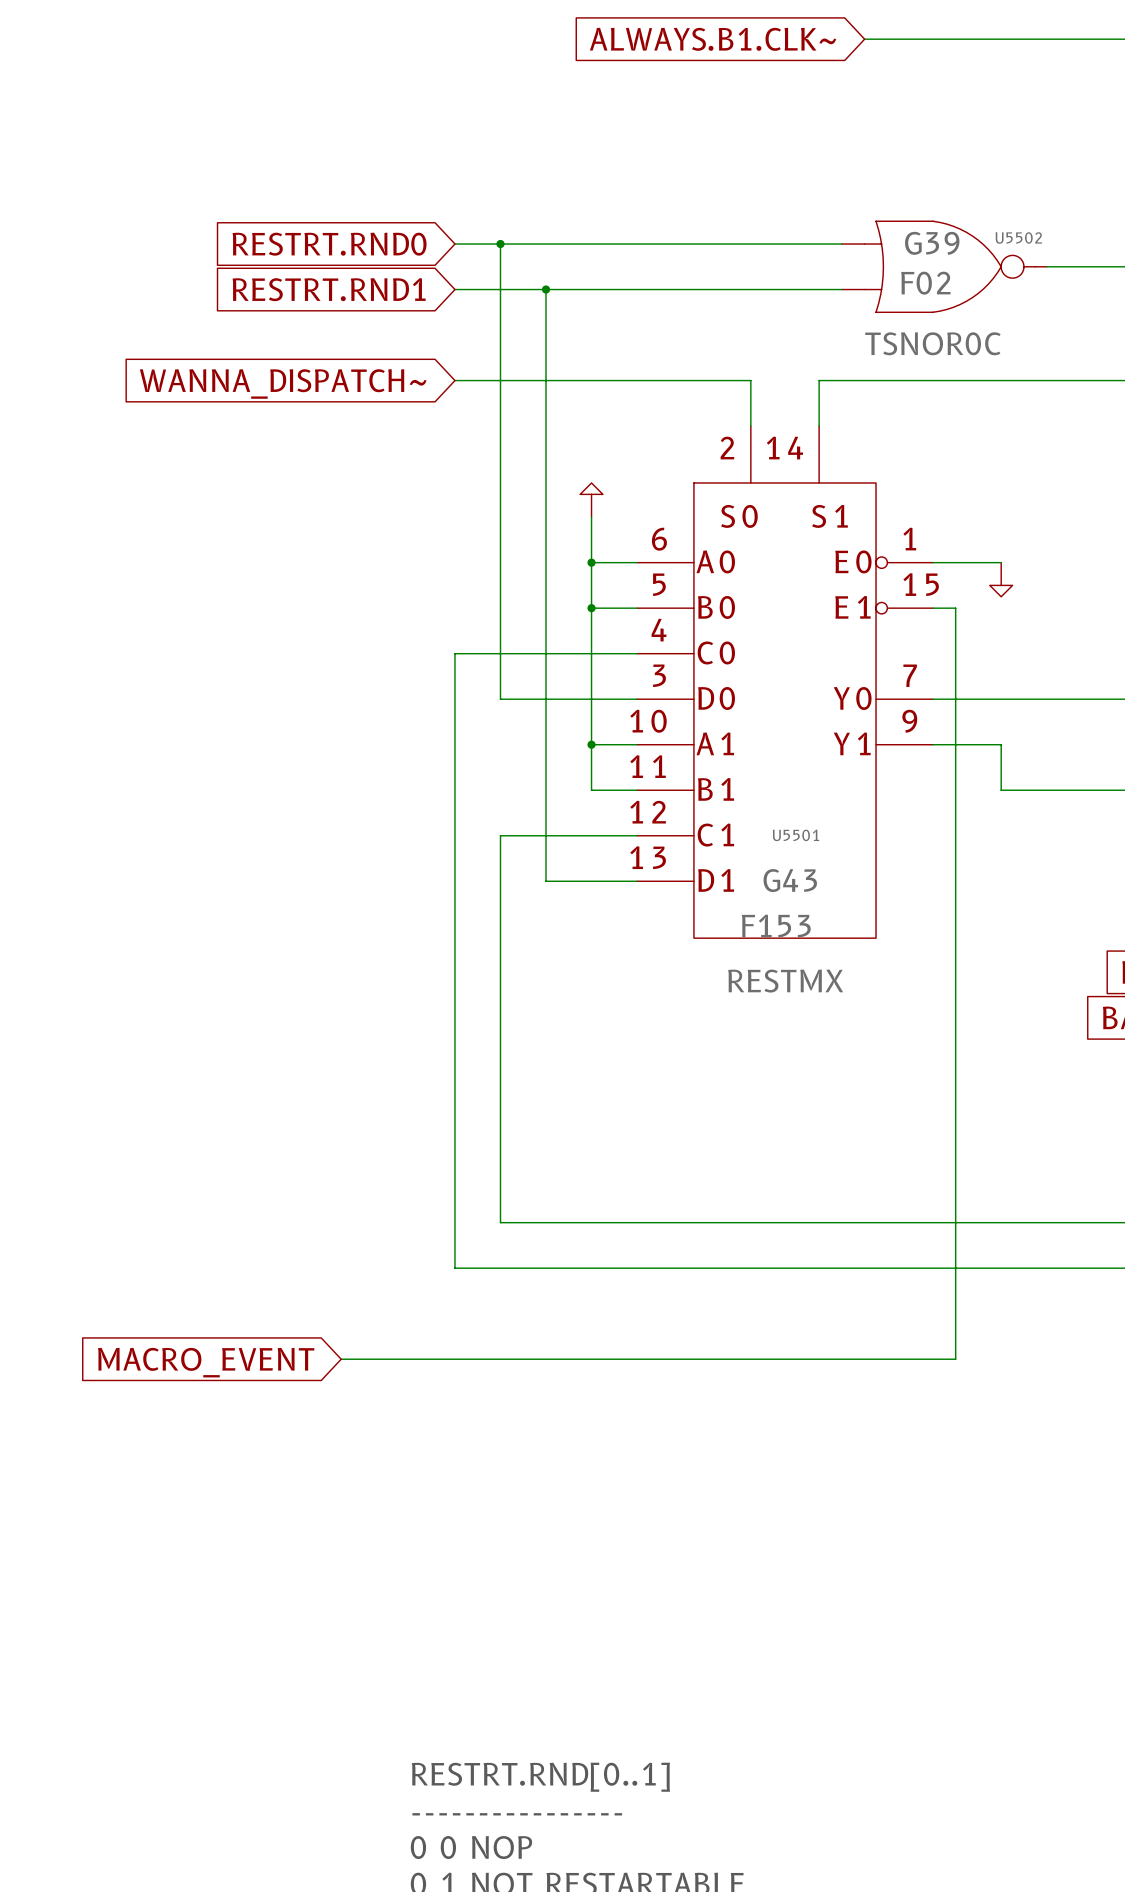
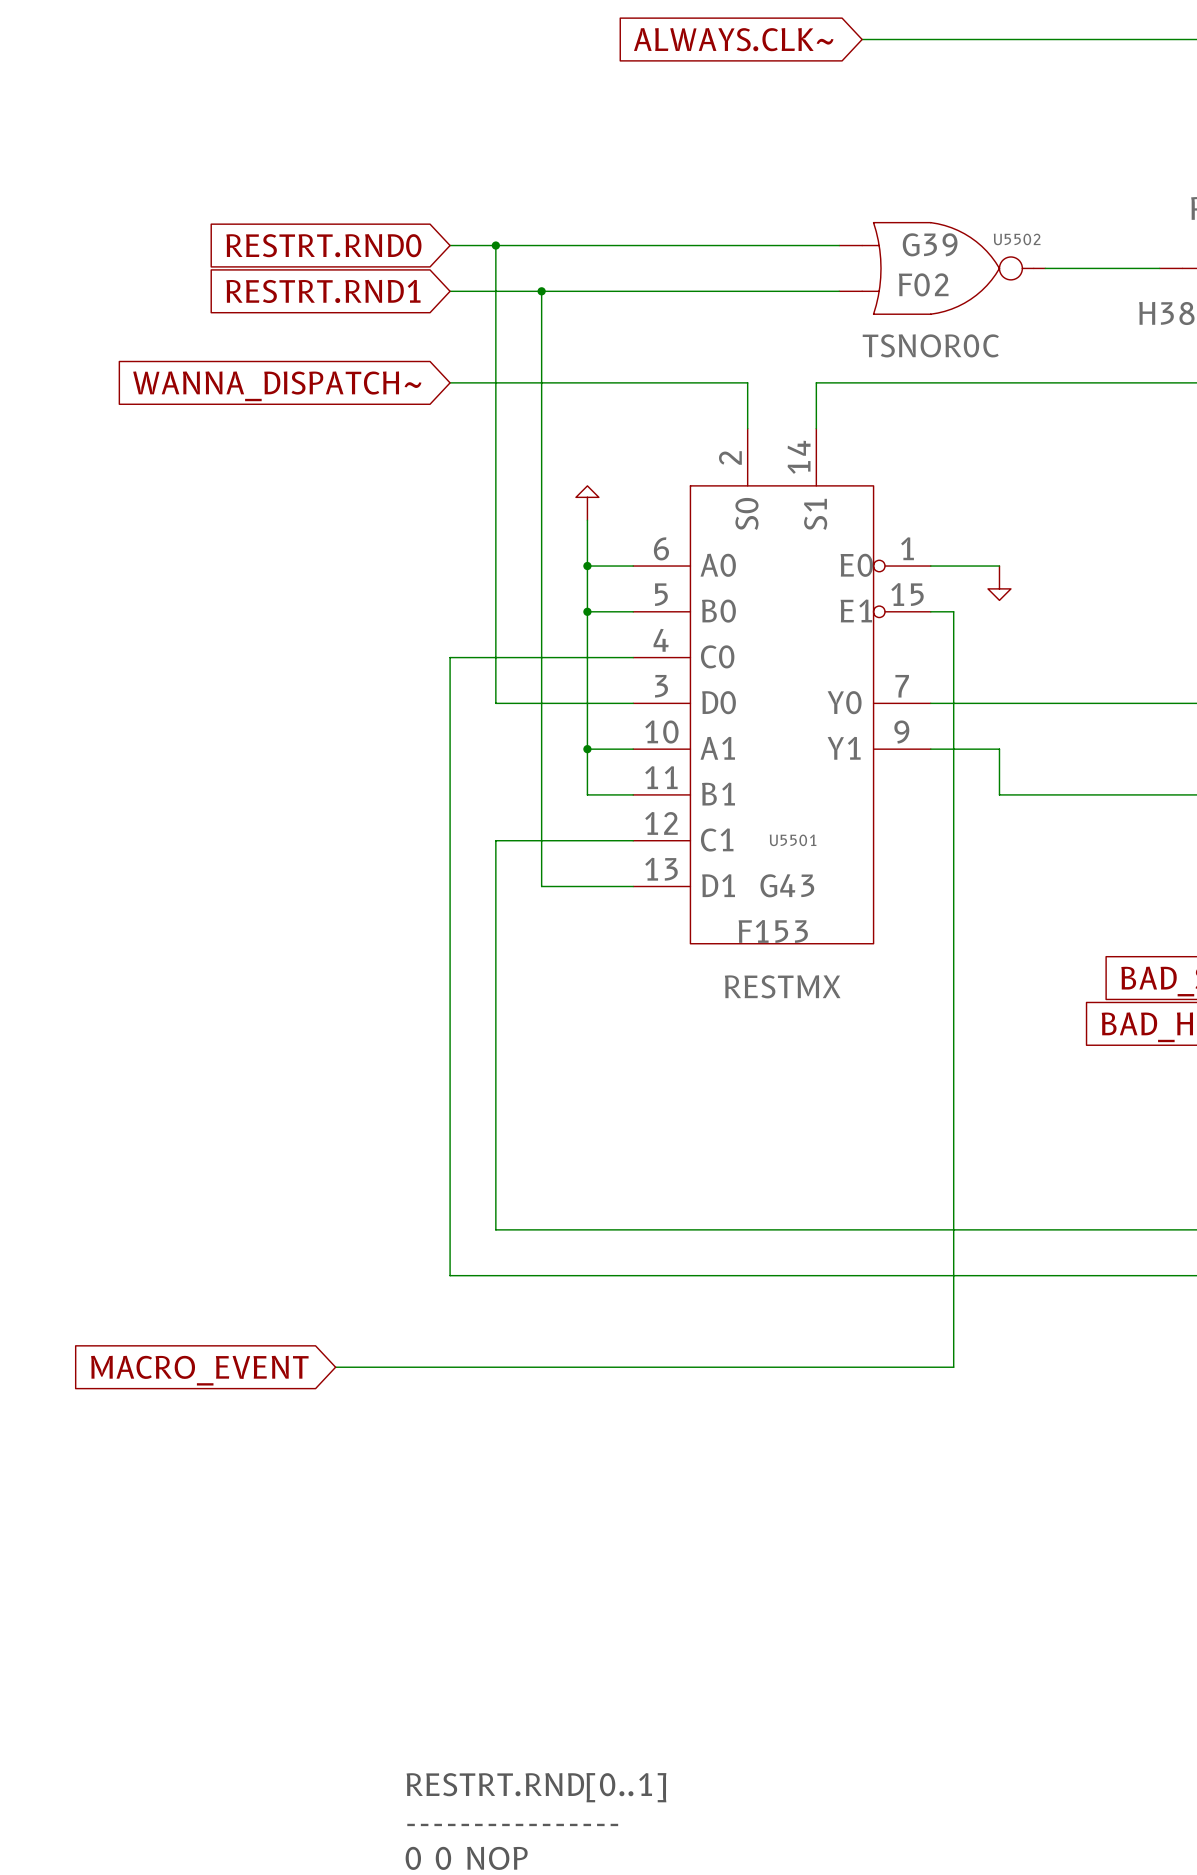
global label: ALWAYS.B1.CLK~ (713, 39) -> ALWAYS.CLK~ (733, 39)
U5501 symbol: [637, 426, 933, 939] -> [633, 428, 931, 944]

